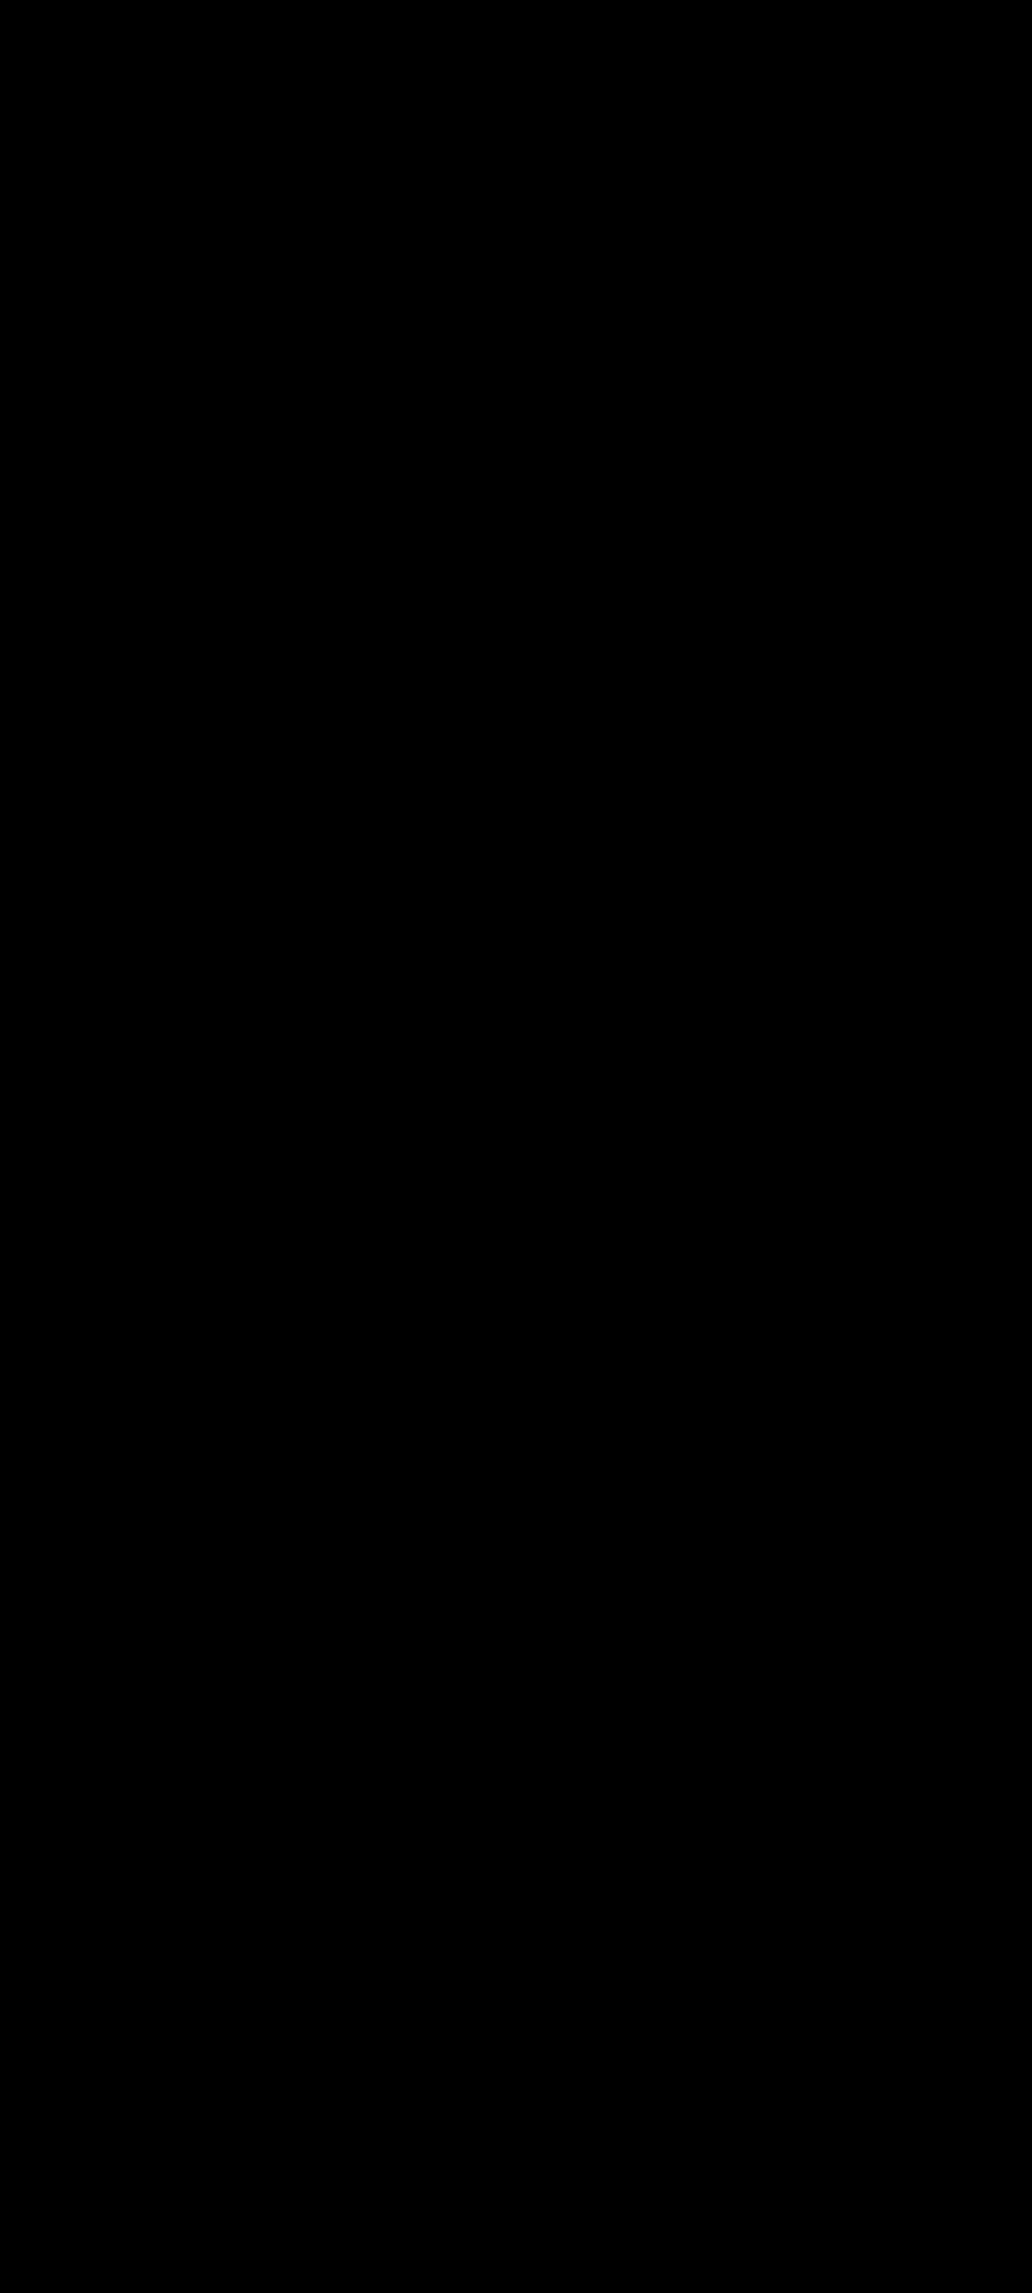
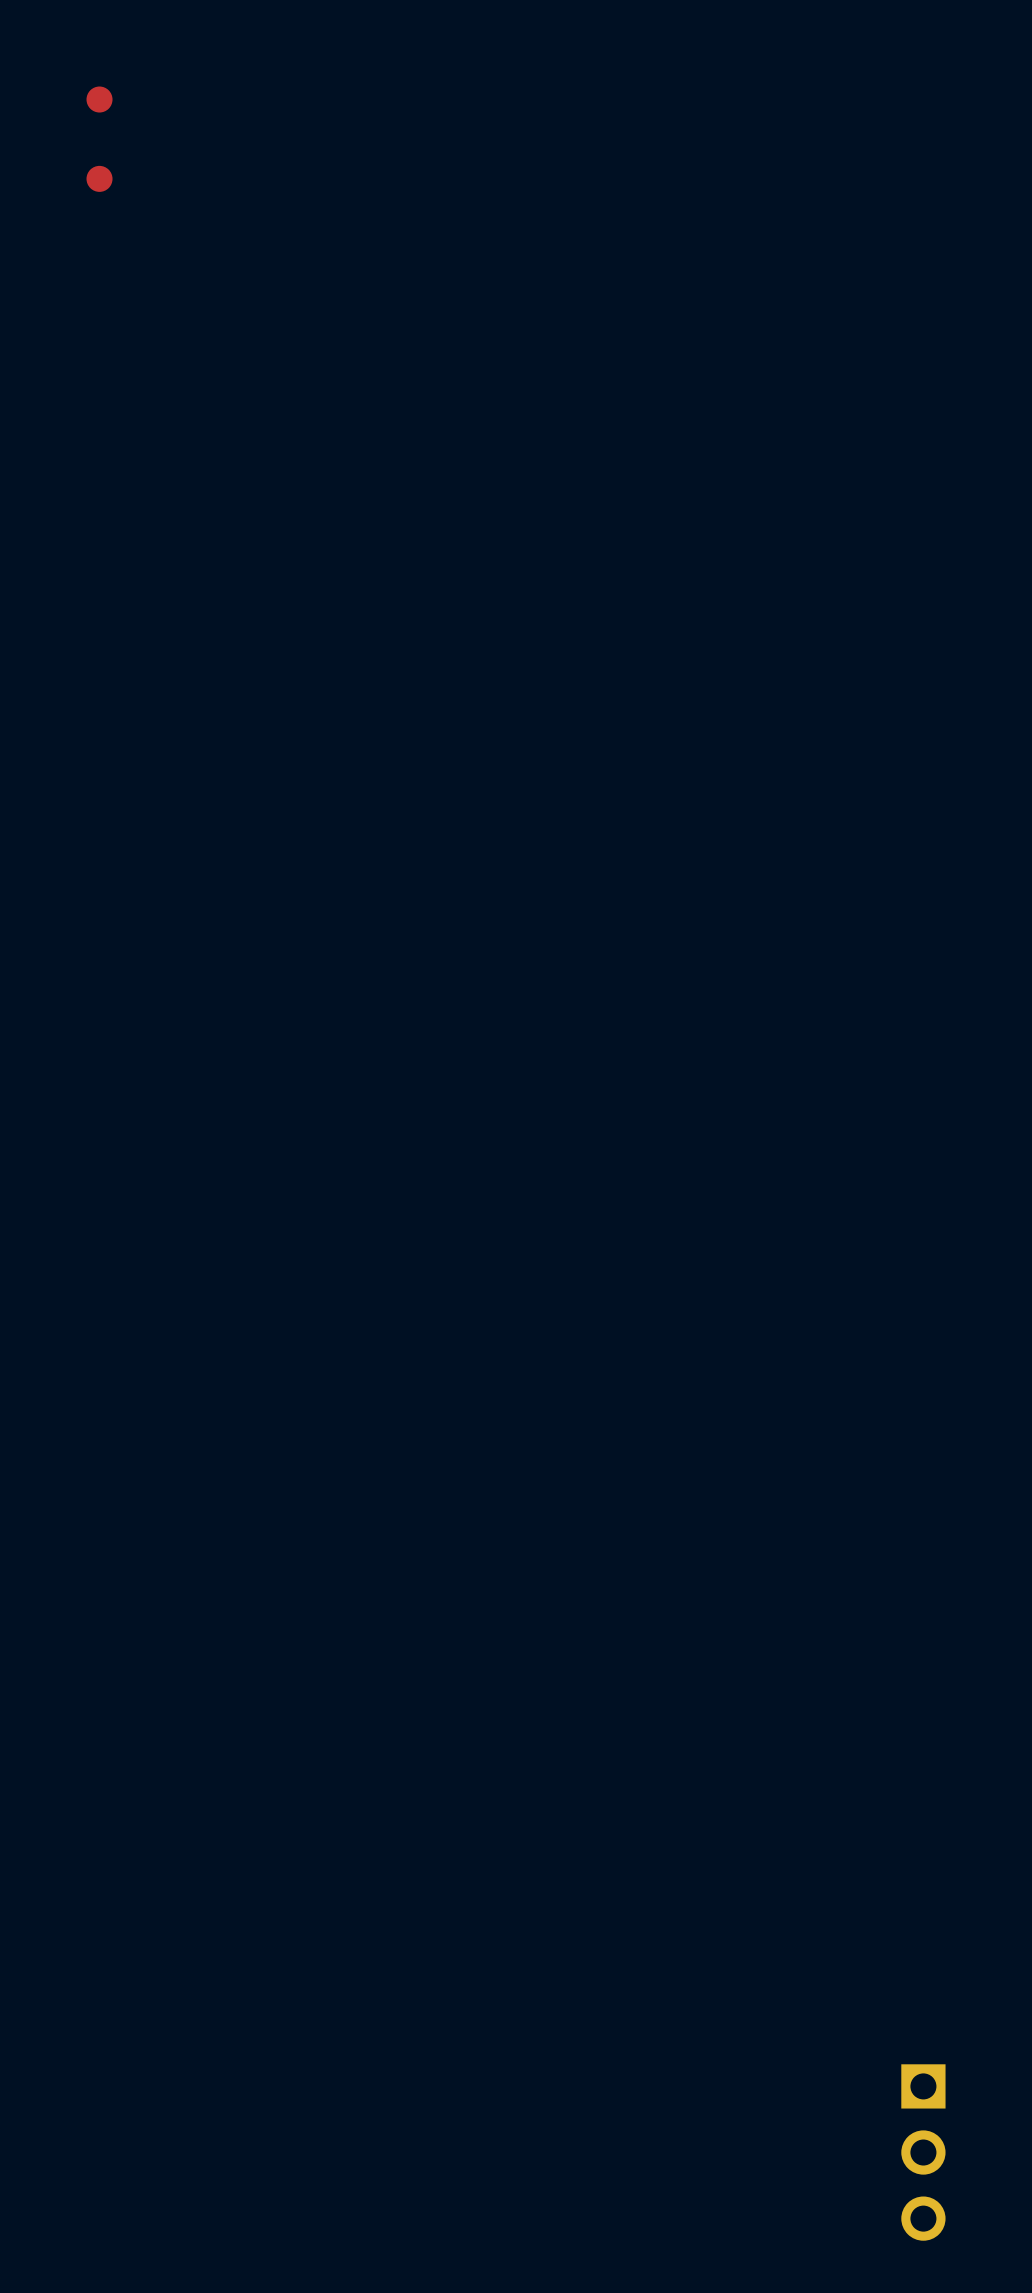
part: none -> (99, 99)
part: none -> (99, 178)
part: none -> (923, 2152)

